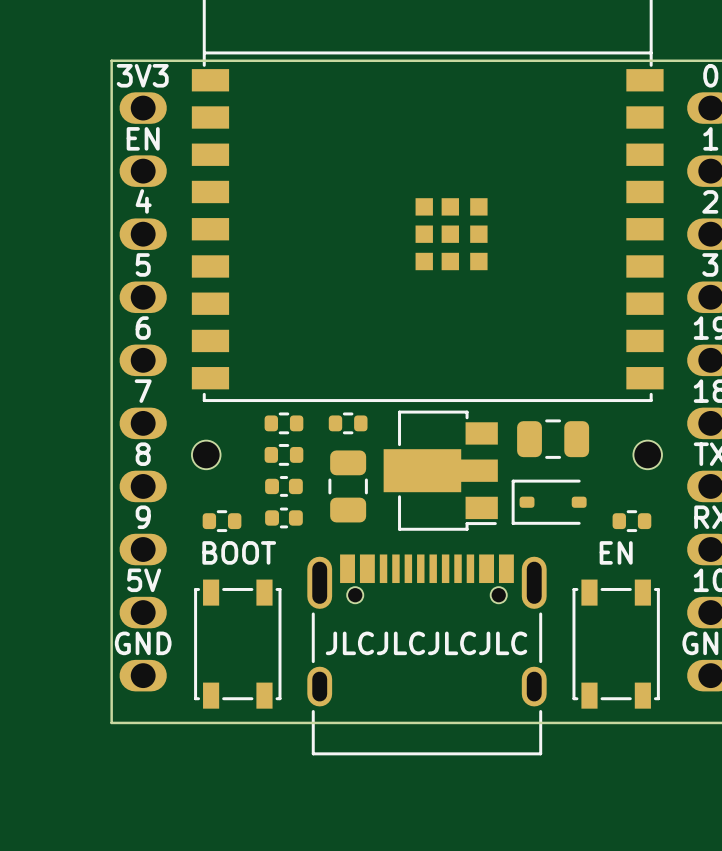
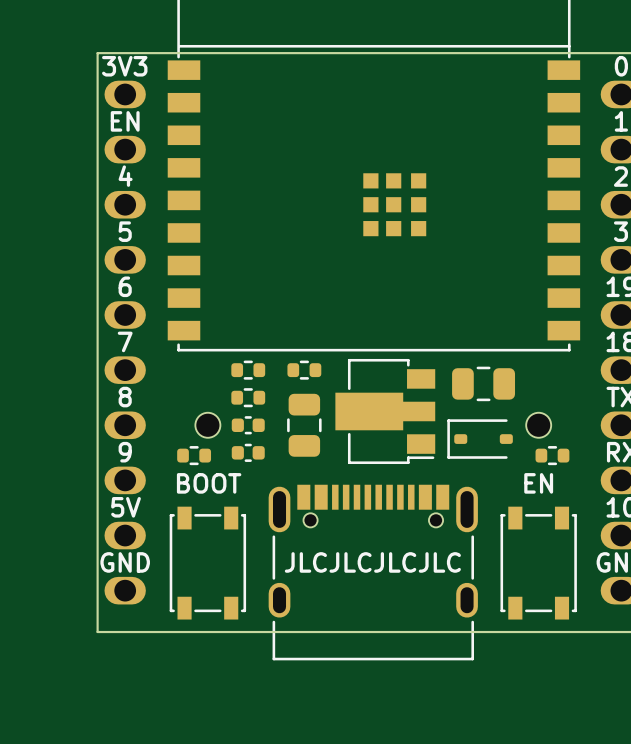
part position: (206, 454) -> (207, 425)
part position: (647, 454) -> (538, 425)

